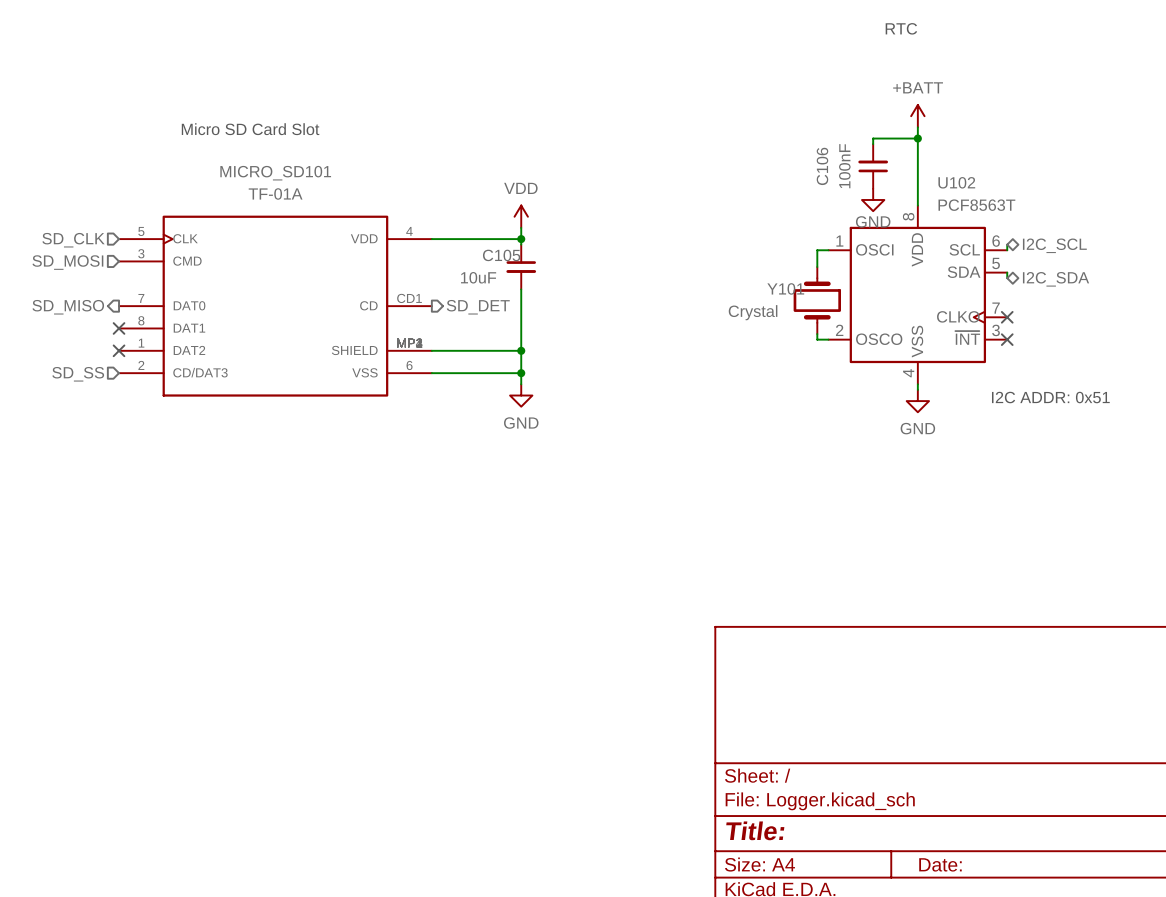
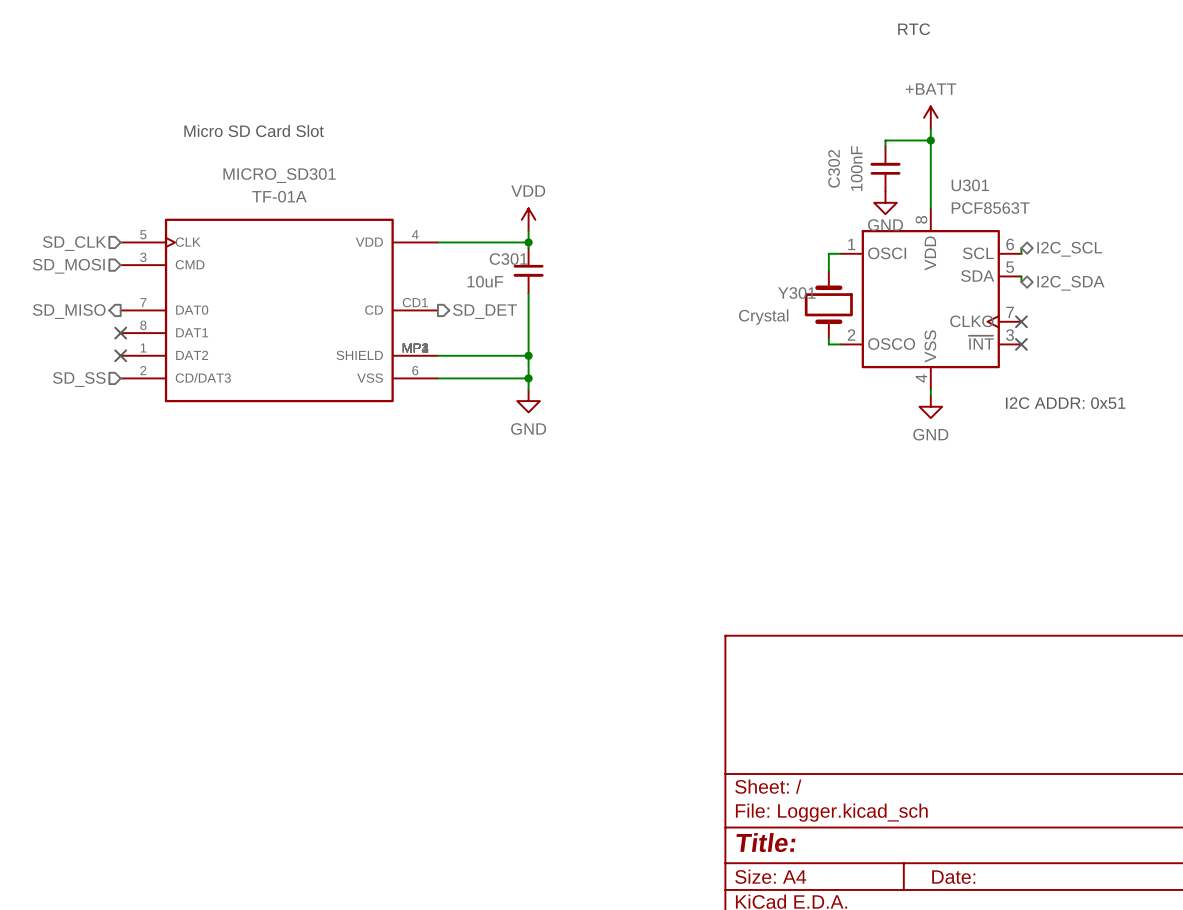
C106 name: C106 (822, 166) -> C302 (834, 168)
MICRO_SD101 name: MICRO_SD101 (275, 173) -> MICRO_SD301 (279, 175)
U102 name: U102 (956, 182) -> U301 (970, 185)
C105 name: C105 (501, 255) -> C301 (508, 259)
Y101 name: Y101 (785, 288) -> Y301 (796, 293)

